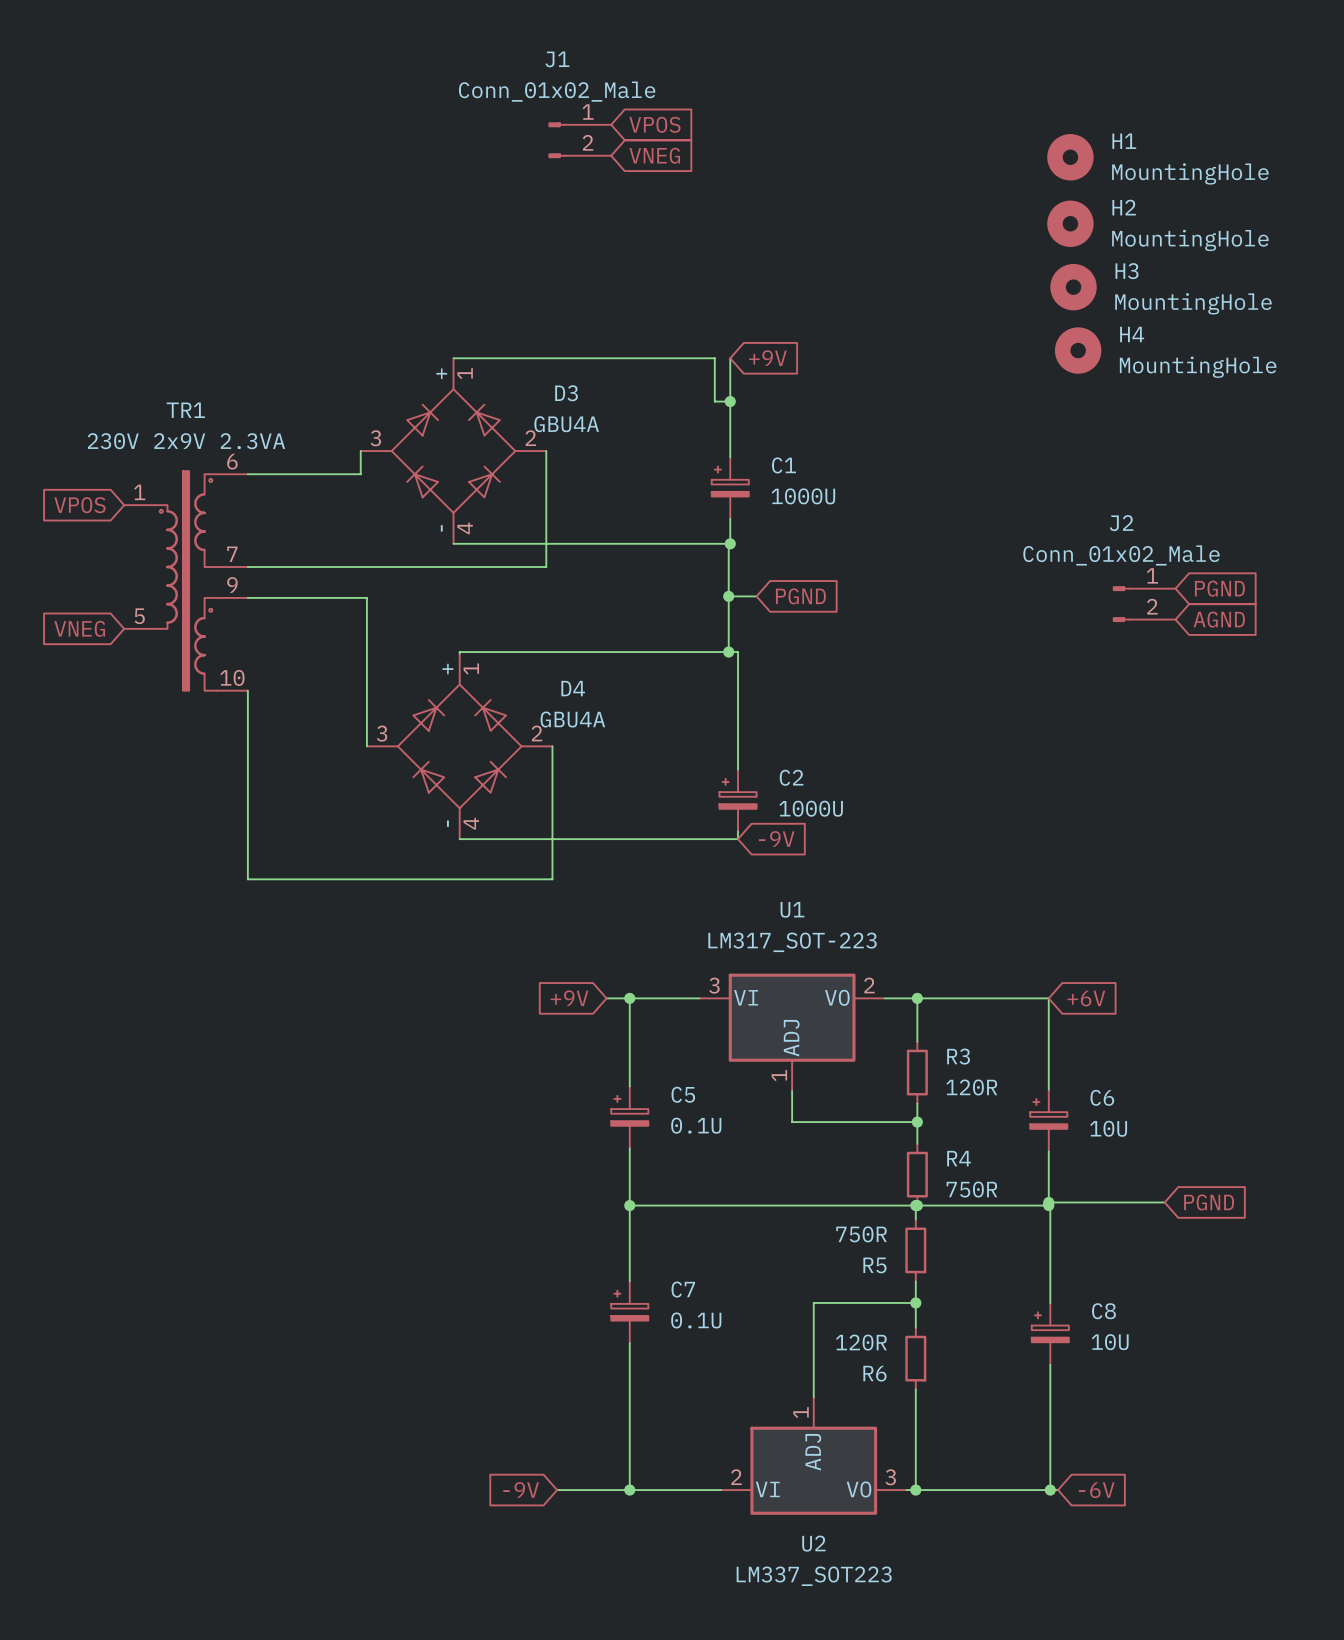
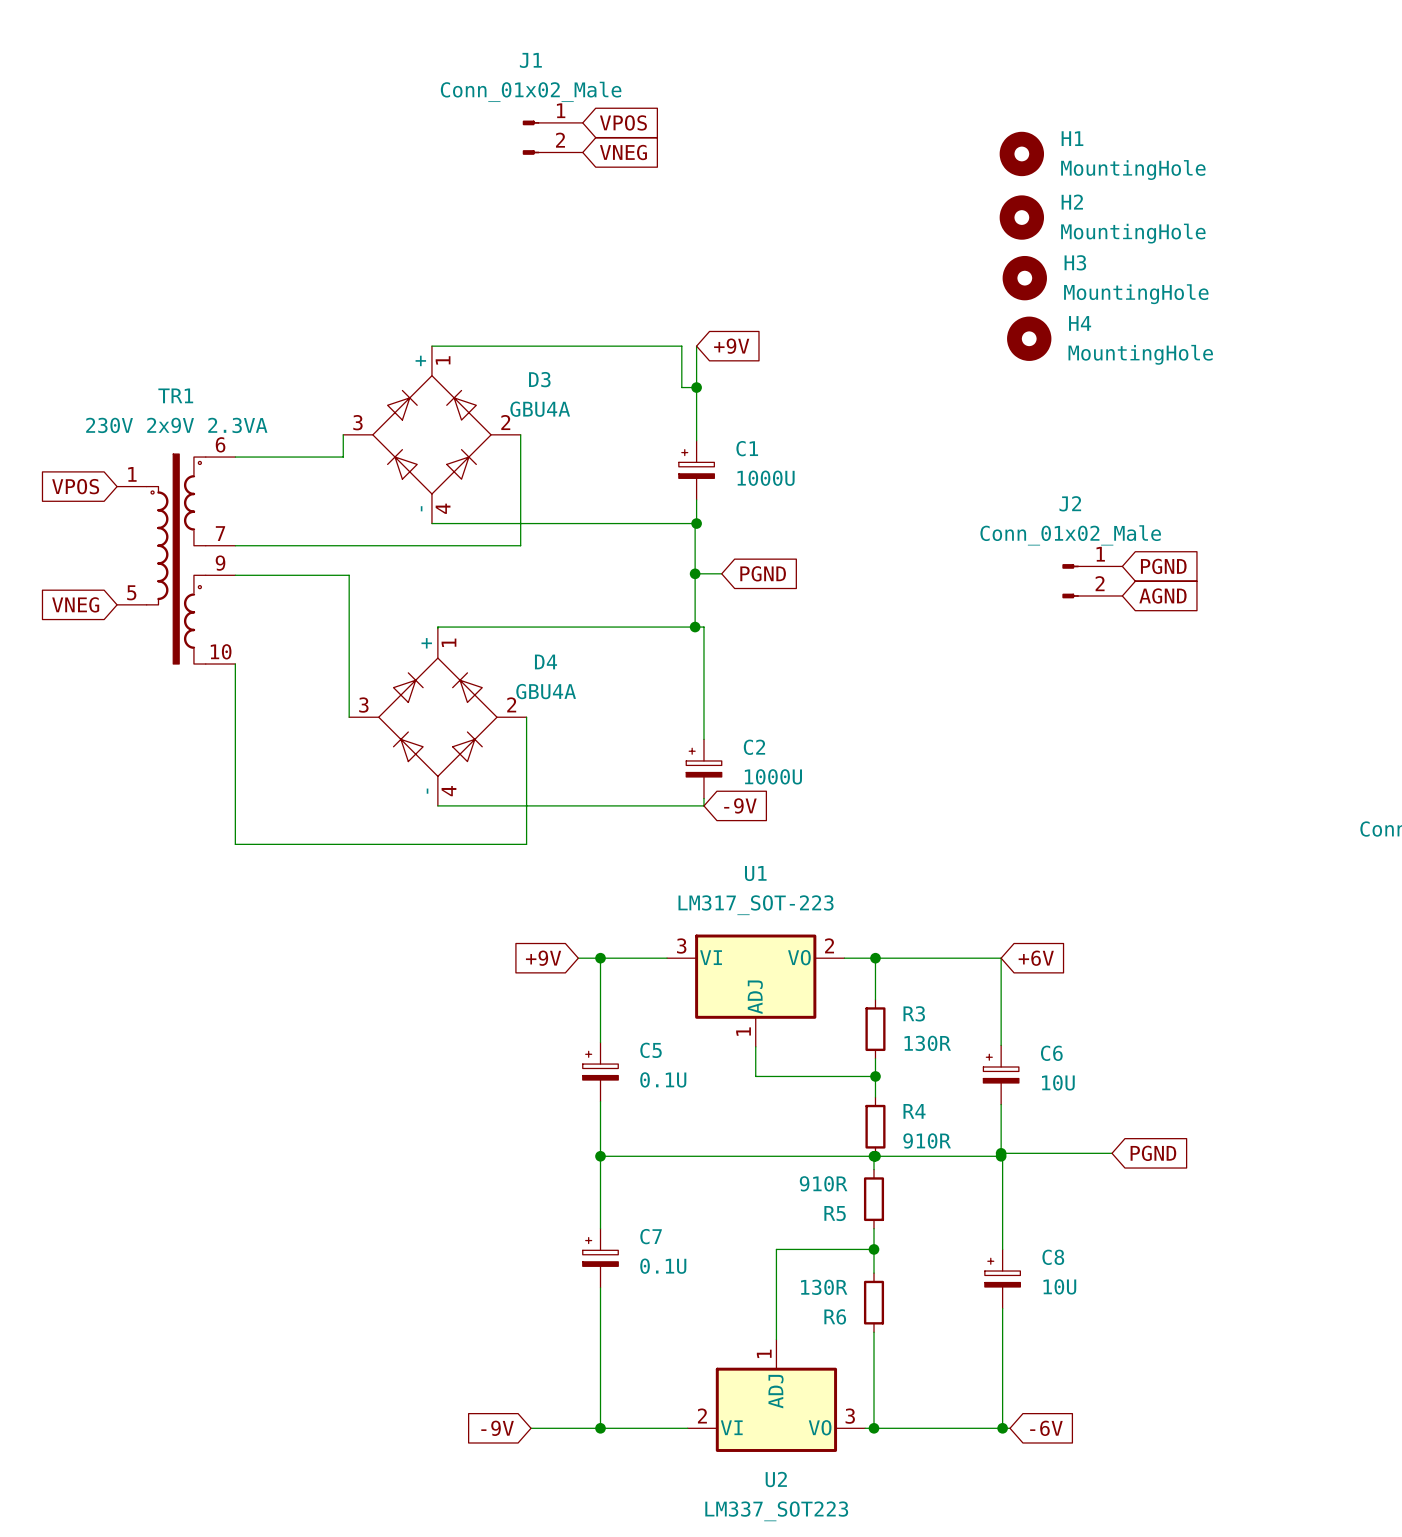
R3 value: 120R (971, 1087) -> 130R (927, 1043)
R4 value: 750R (971, 1189) -> 910R (927, 1140)
R5 value: 750R (861, 1234) -> 910R (823, 1183)
R6 value: 120R (861, 1342) -> 130R (824, 1287)

